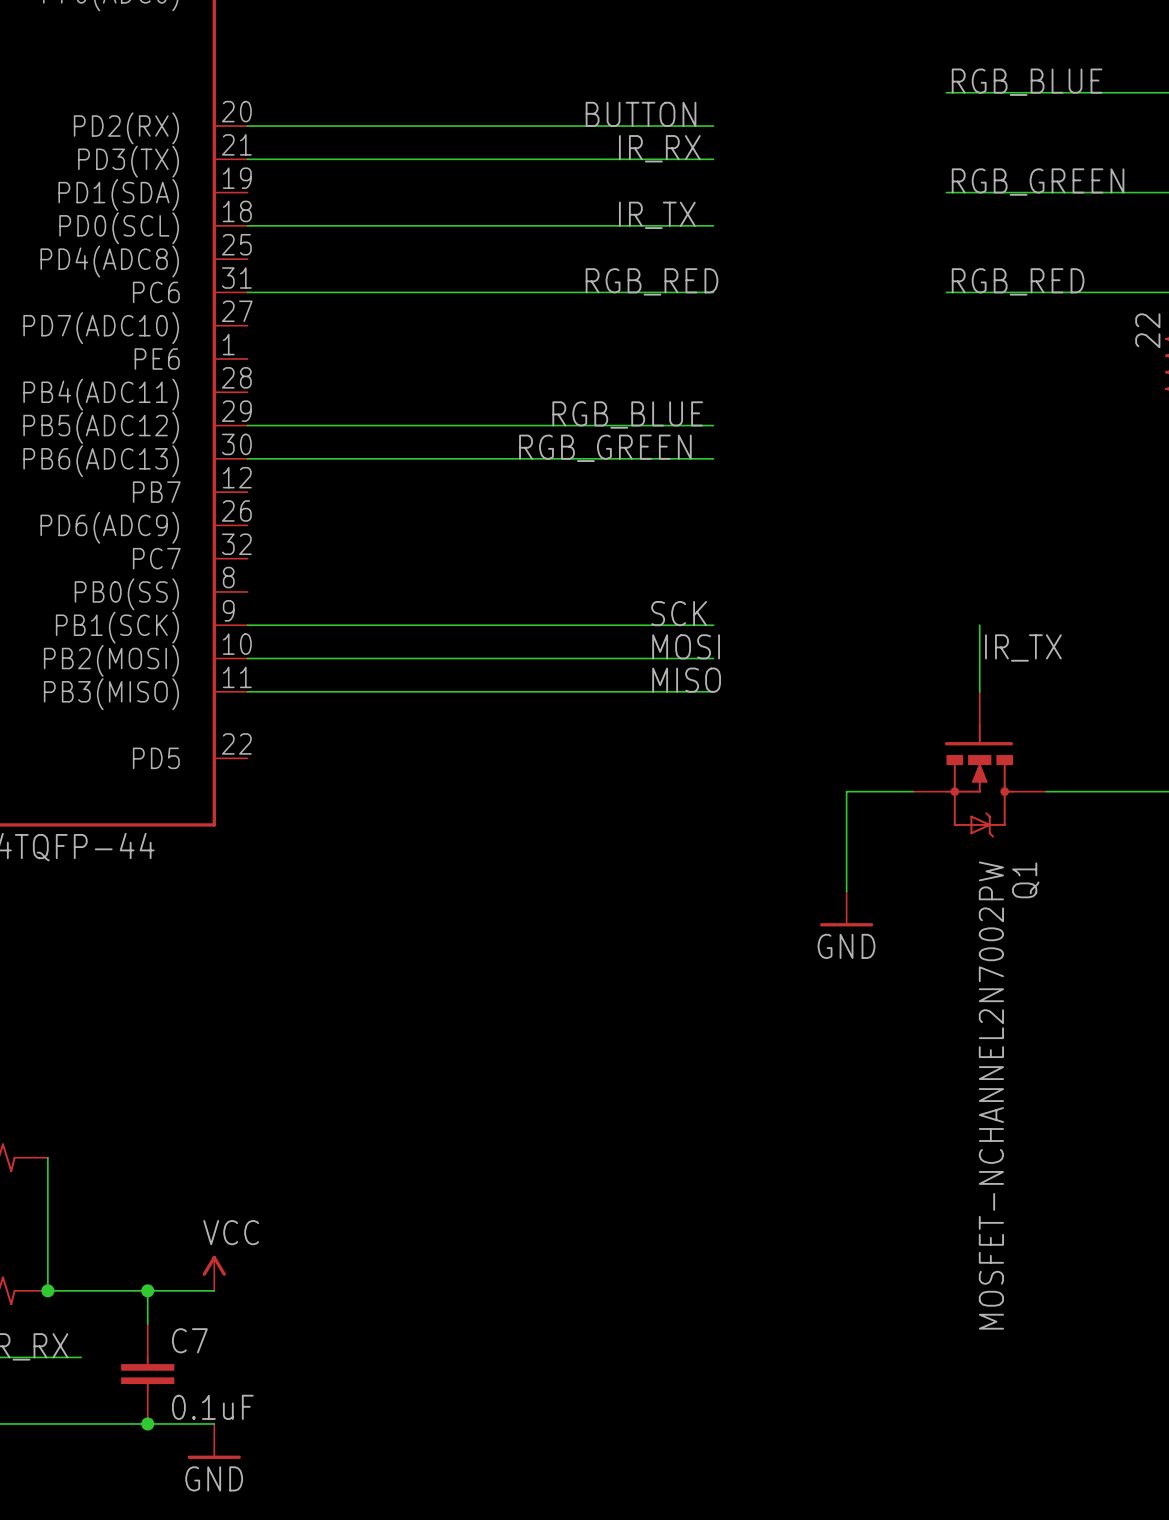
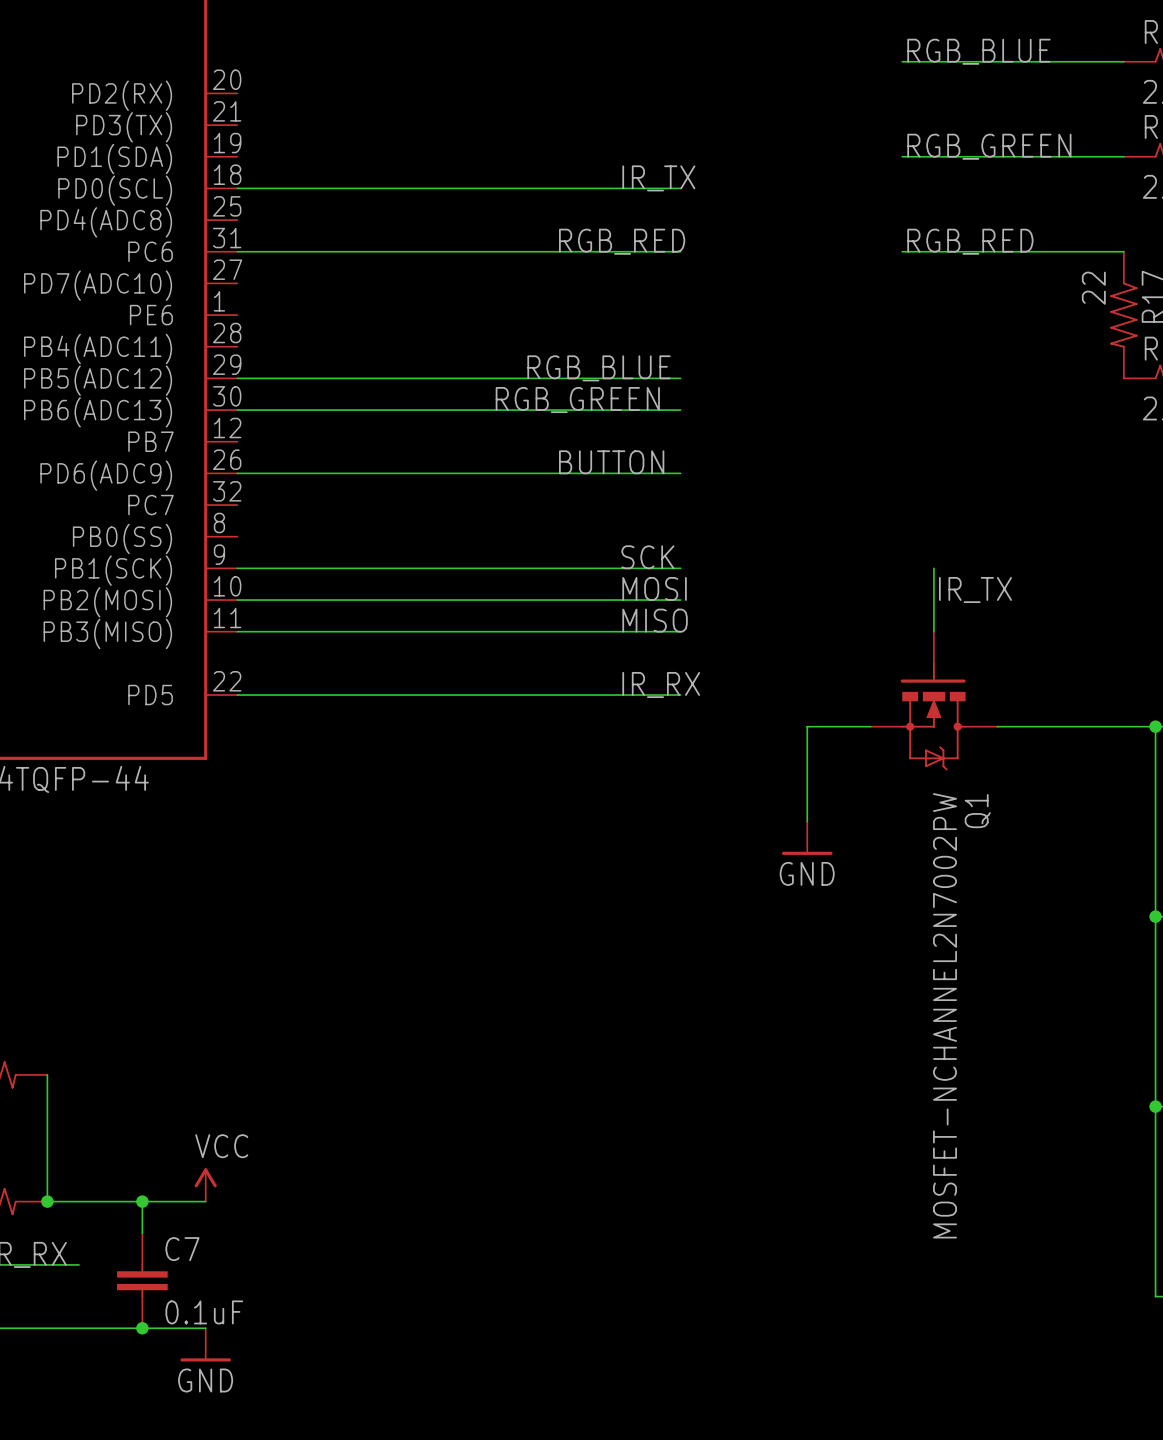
label: BUTTON (641, 114) -> none
wire: (247, 126) (713, 126) -> none
label: IR_RX (659, 148) -> none
wire: (247, 159) (713, 159) -> none
label position: IR_TX (657, 215) -> IR_TX (658, 178)
label: none -> BUTTON (611, 462)
wire: none -> (237, 473) (680, 473)
label: none -> IR_RX (661, 684)
wire: none -> (237, 695) (680, 695)

